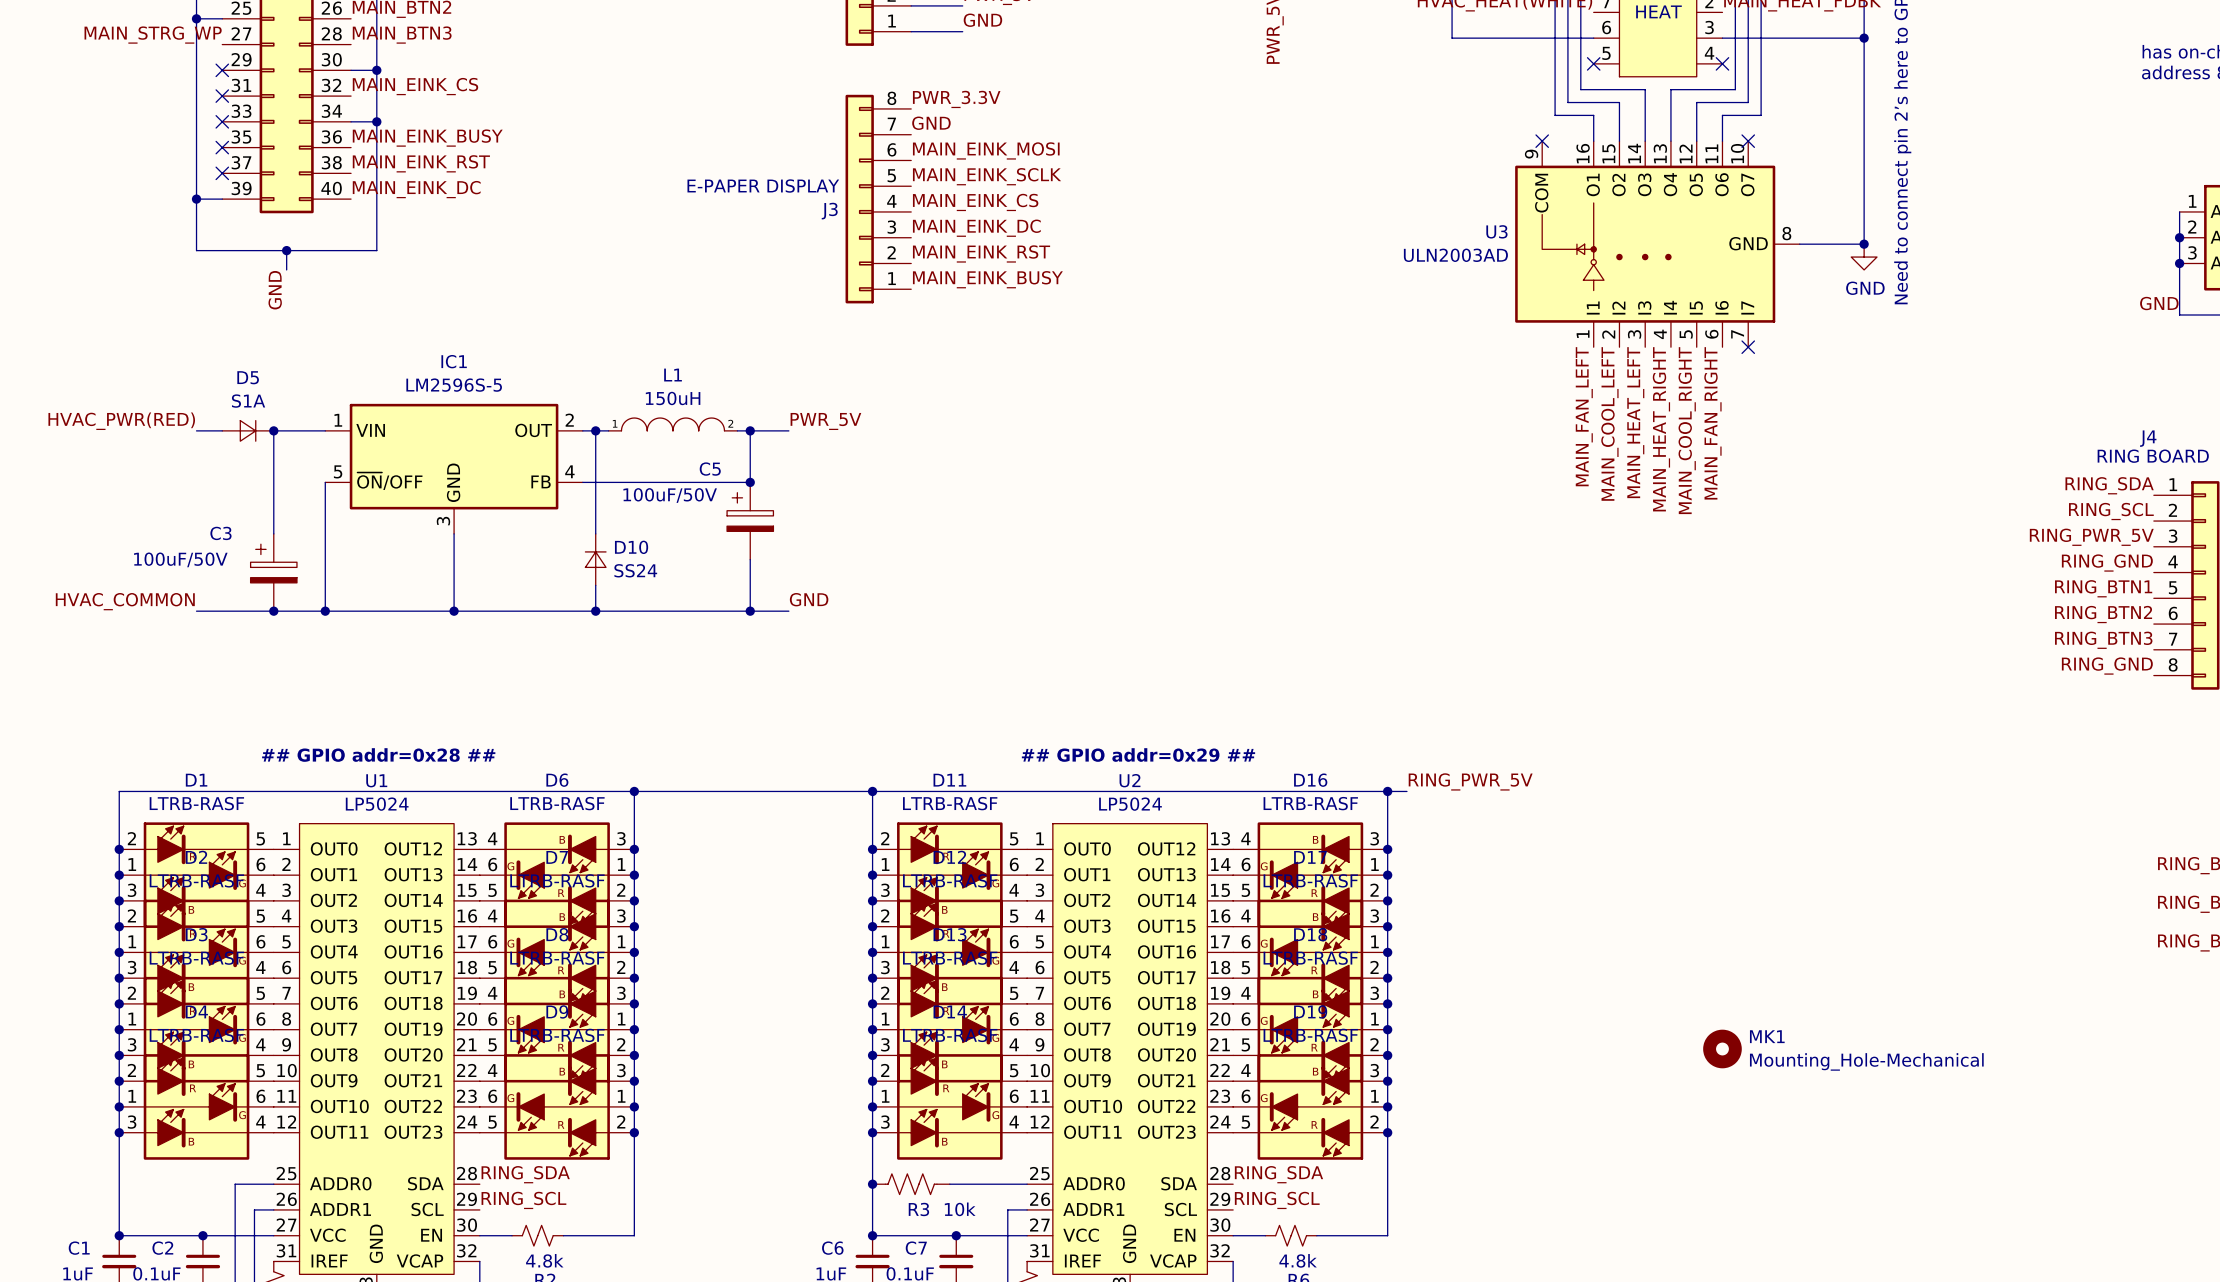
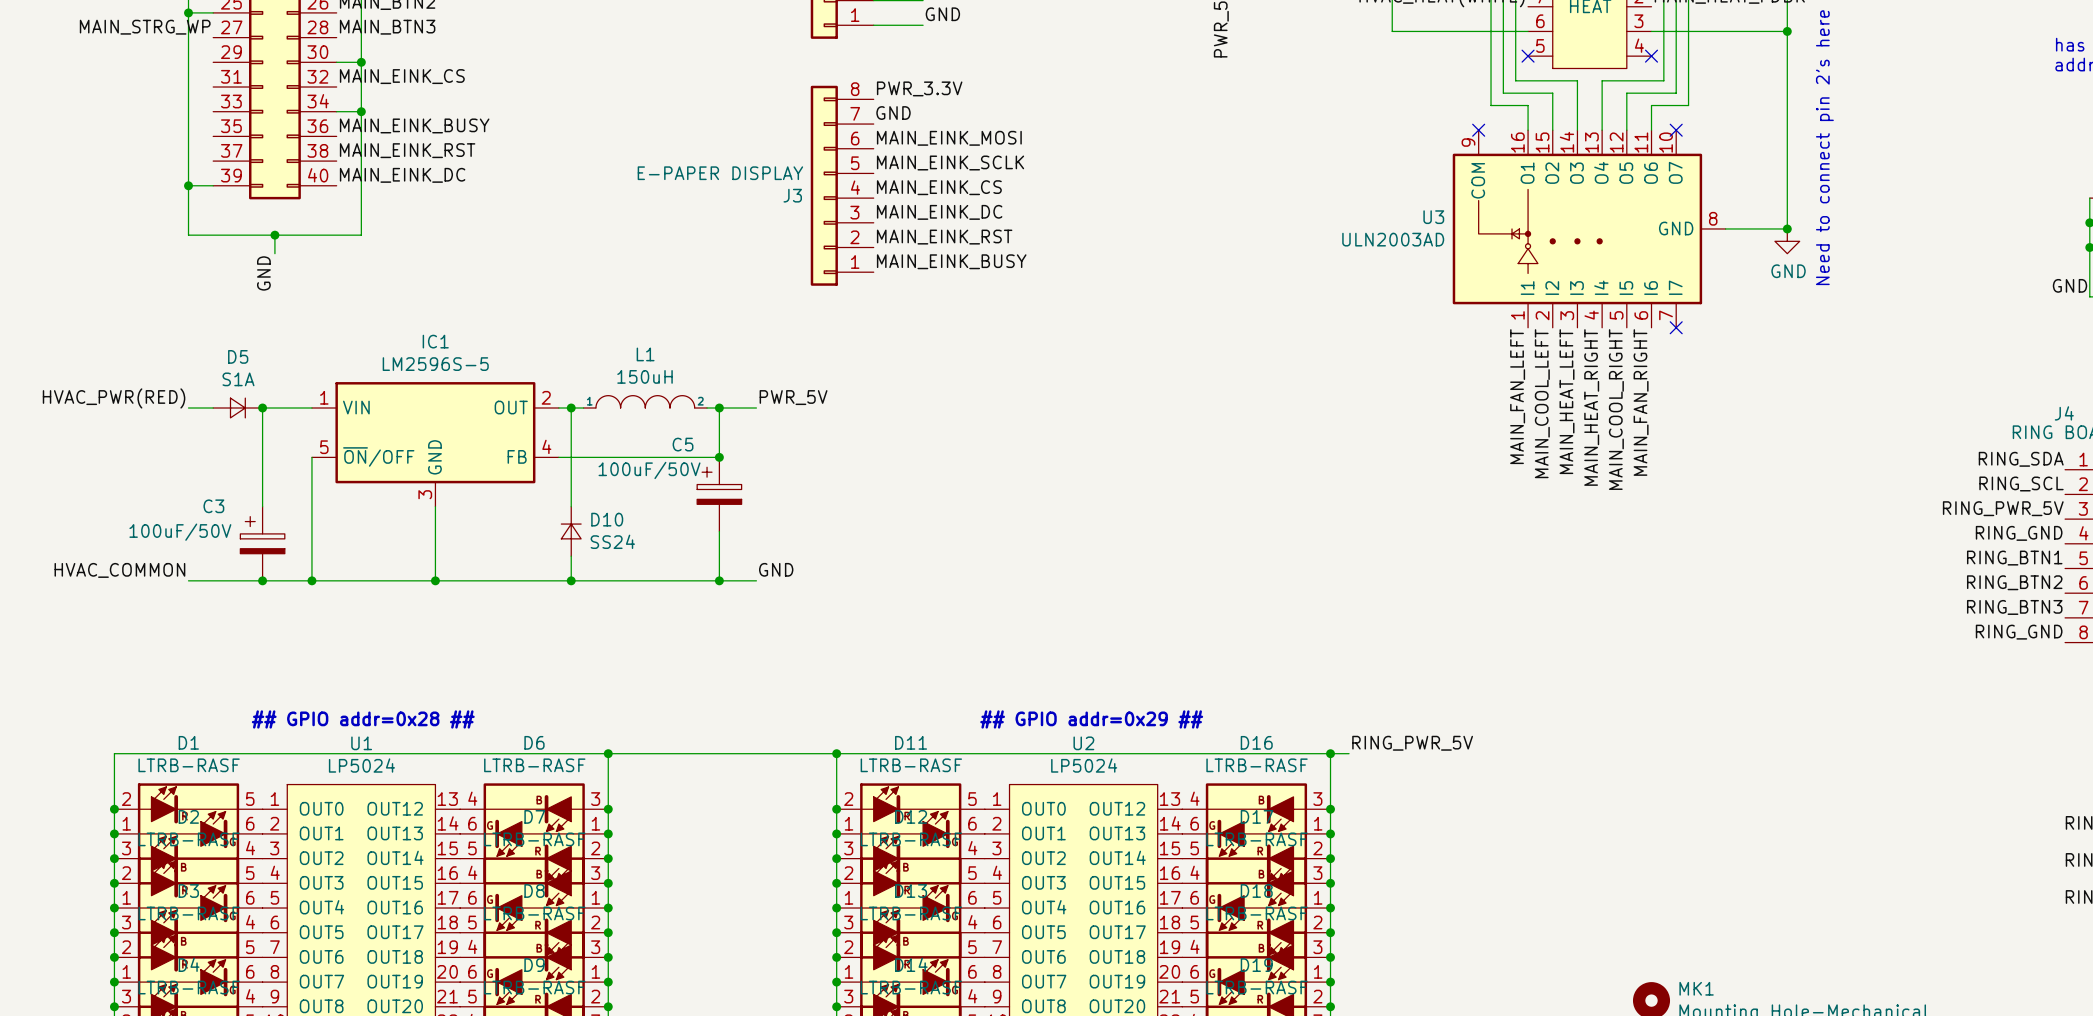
no-connect mark: (222, 70) -> none
no-connect mark: (222, 96) -> none
no-connect mark: (222, 121) -> none
no-connect mark: (222, 147) -> none
no-connect mark: (222, 173) -> none

